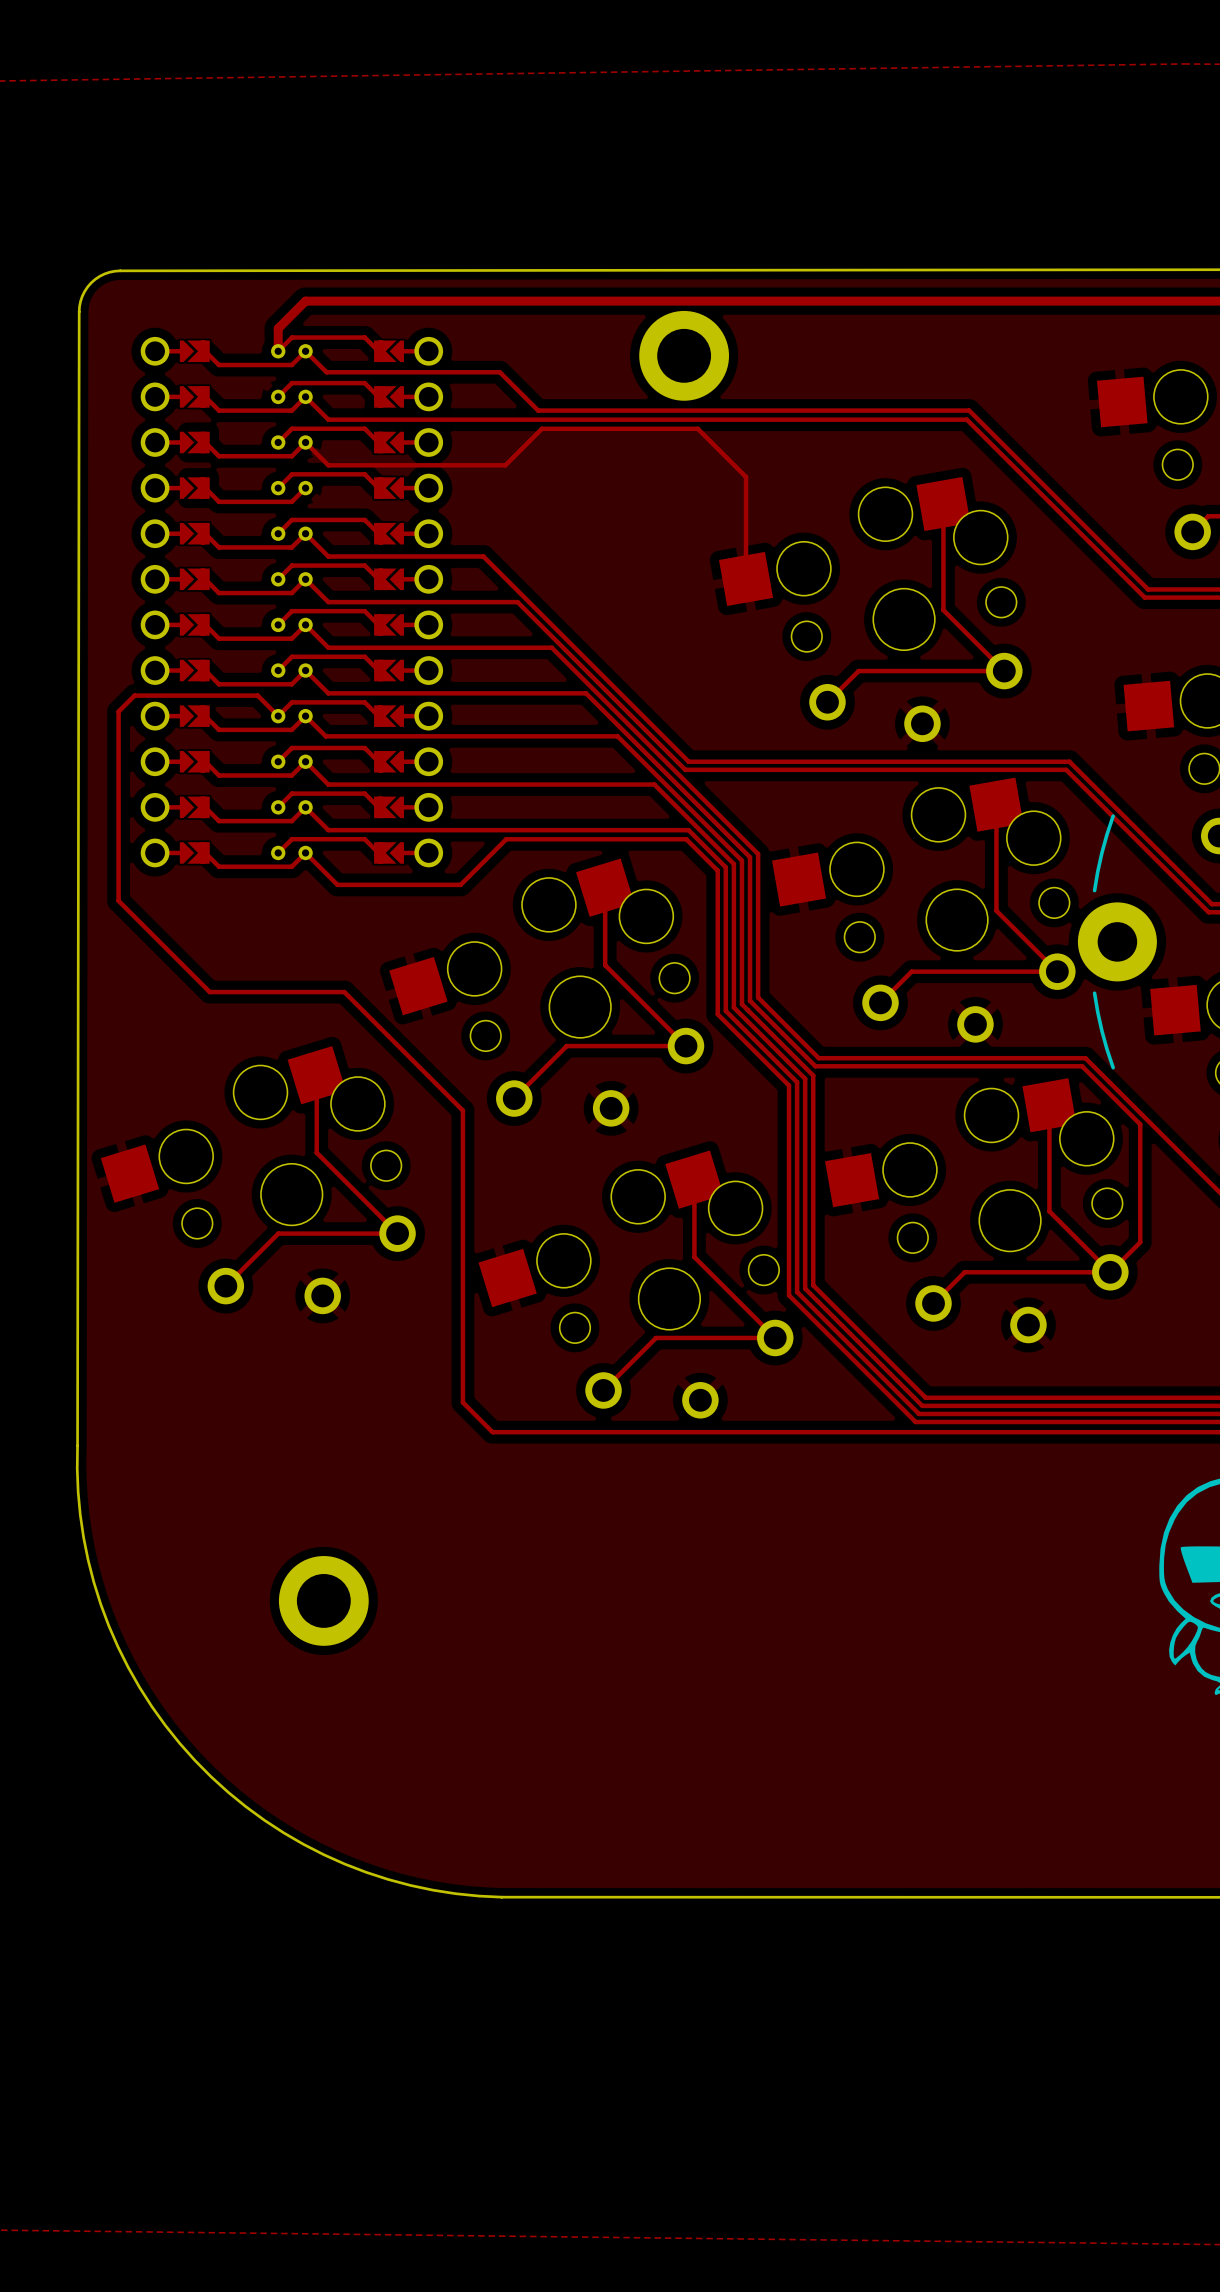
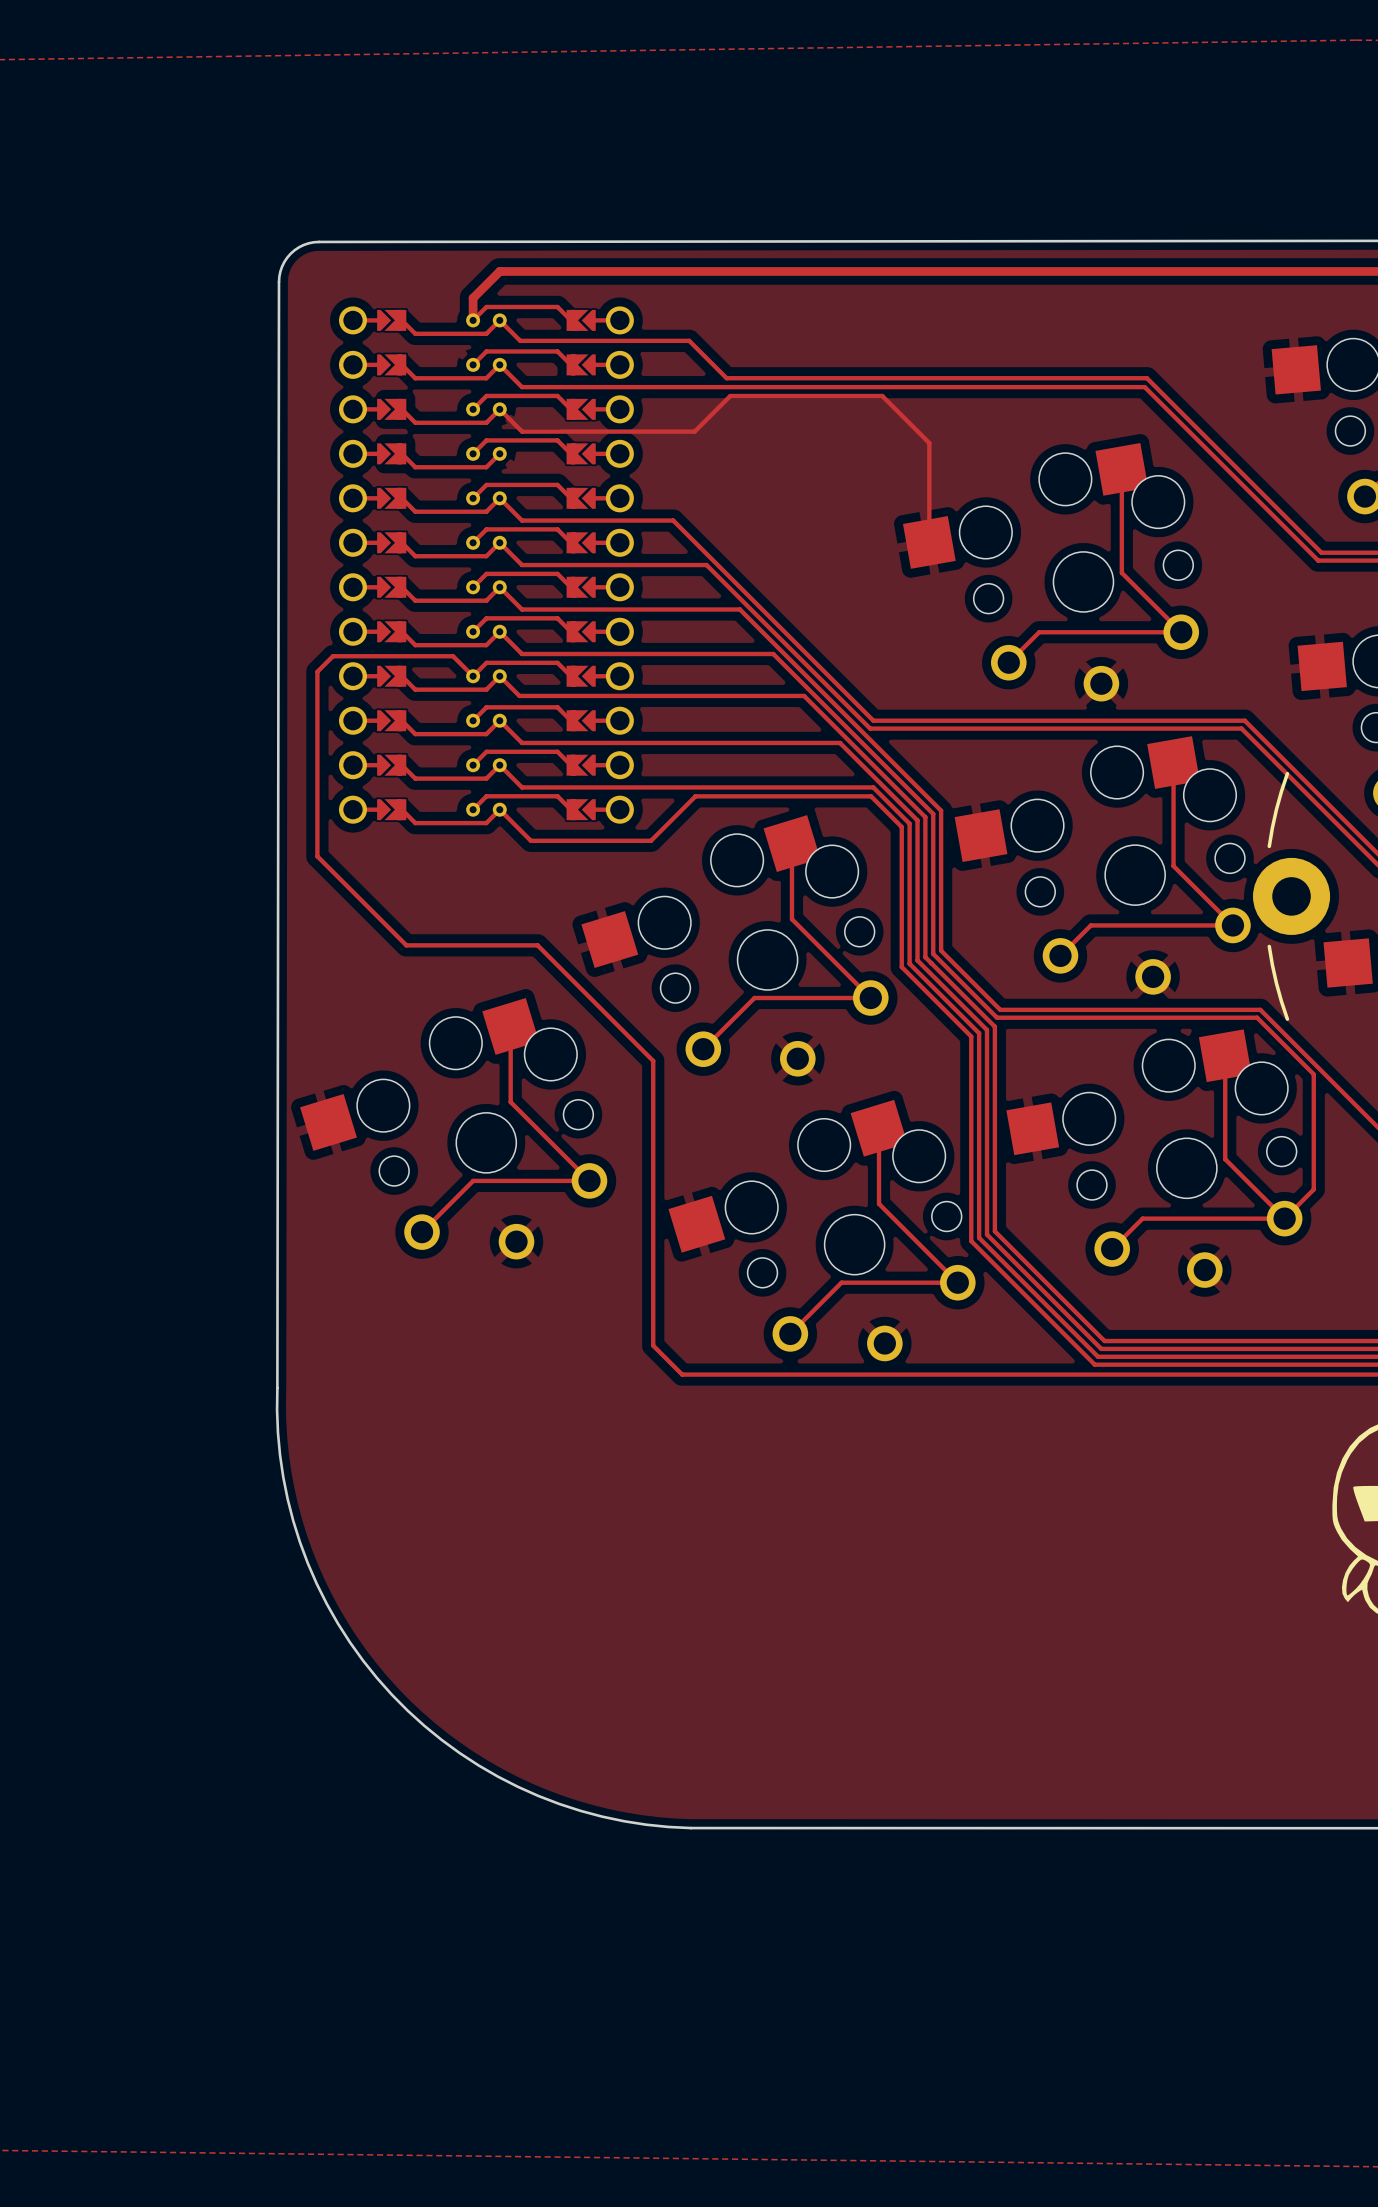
part: (684, 355) -> none
part: (323, 1600) -> none

